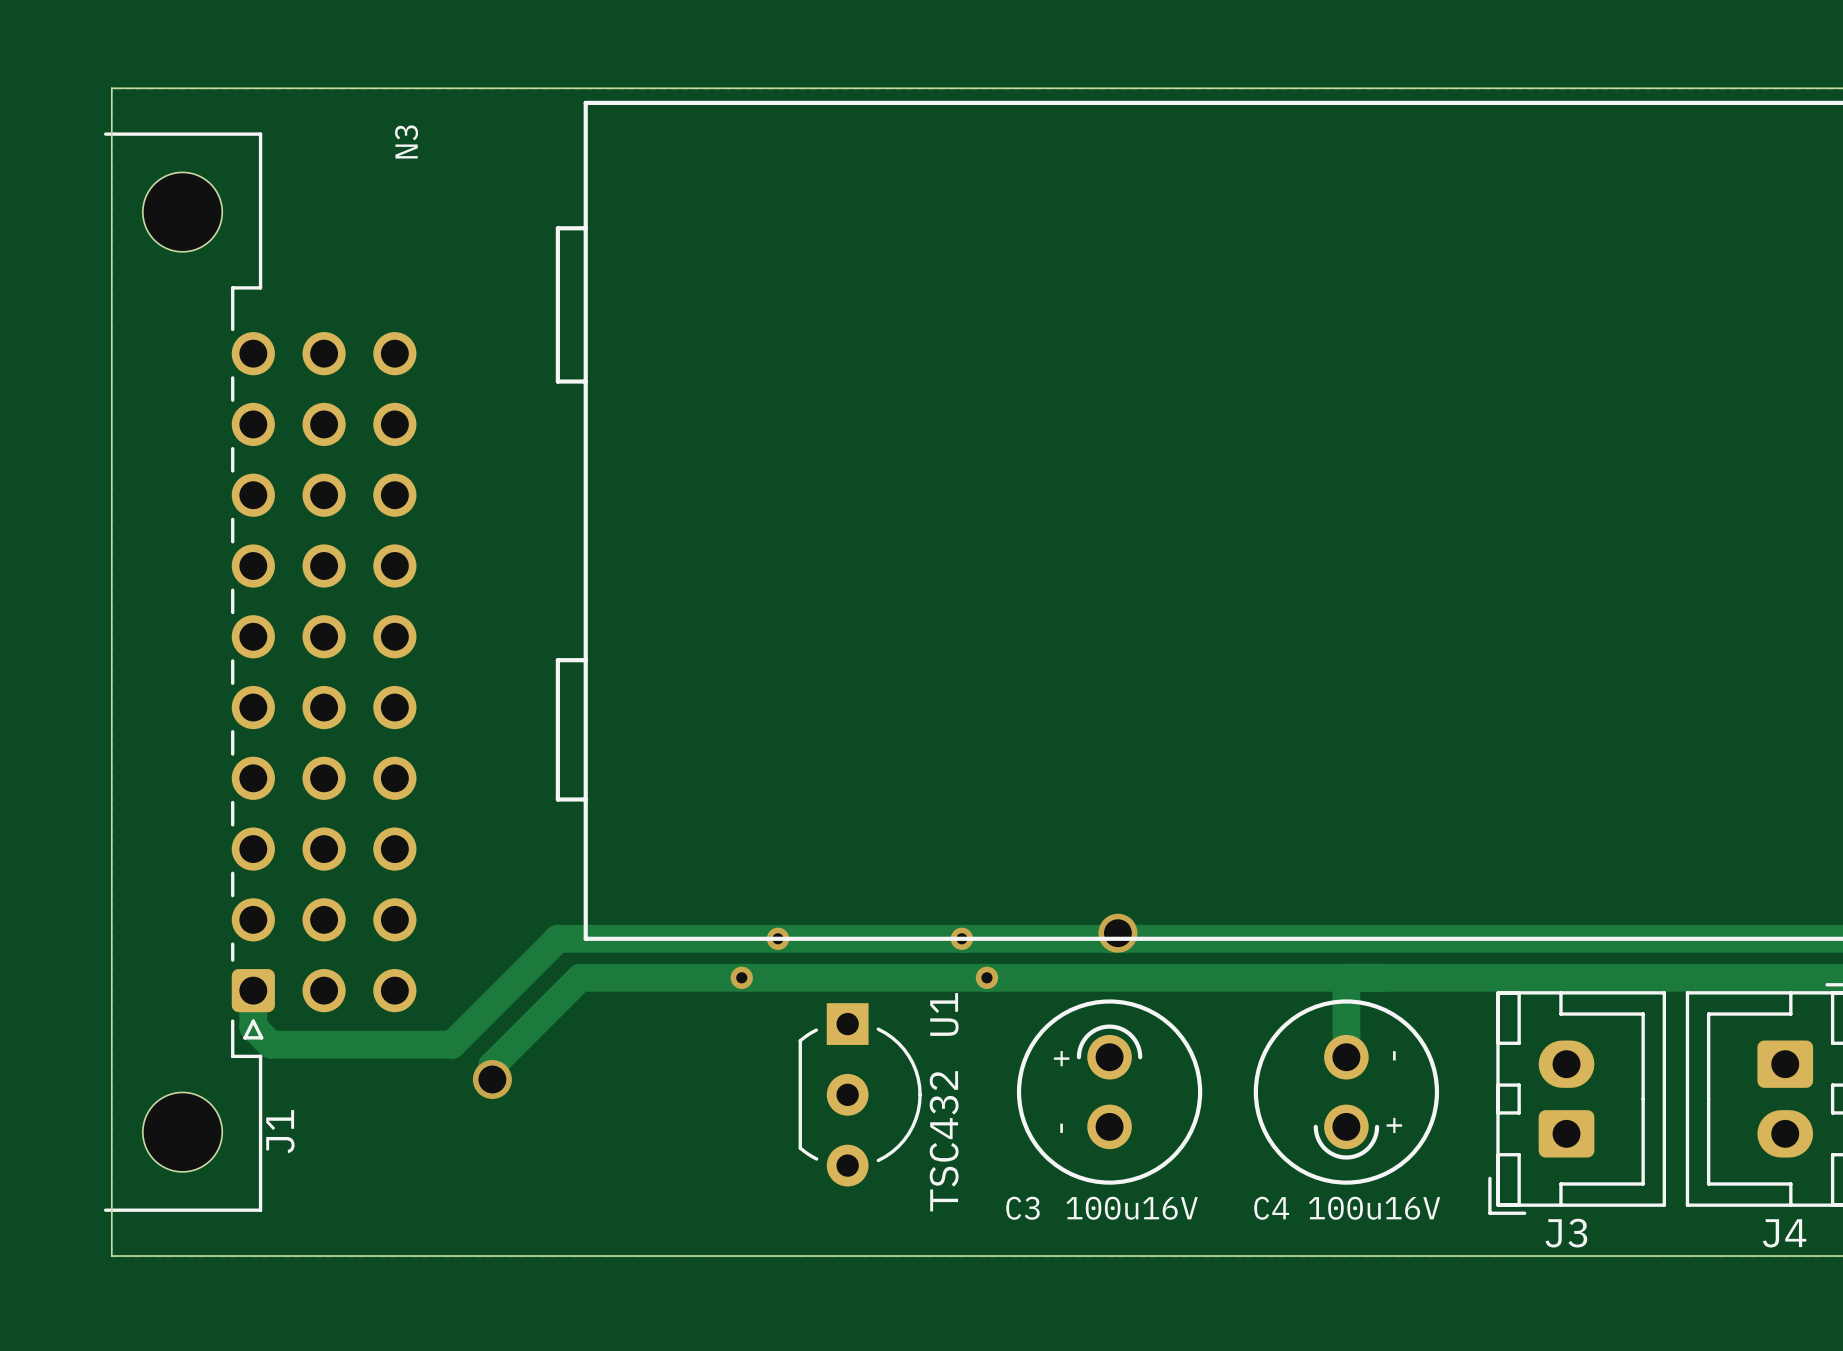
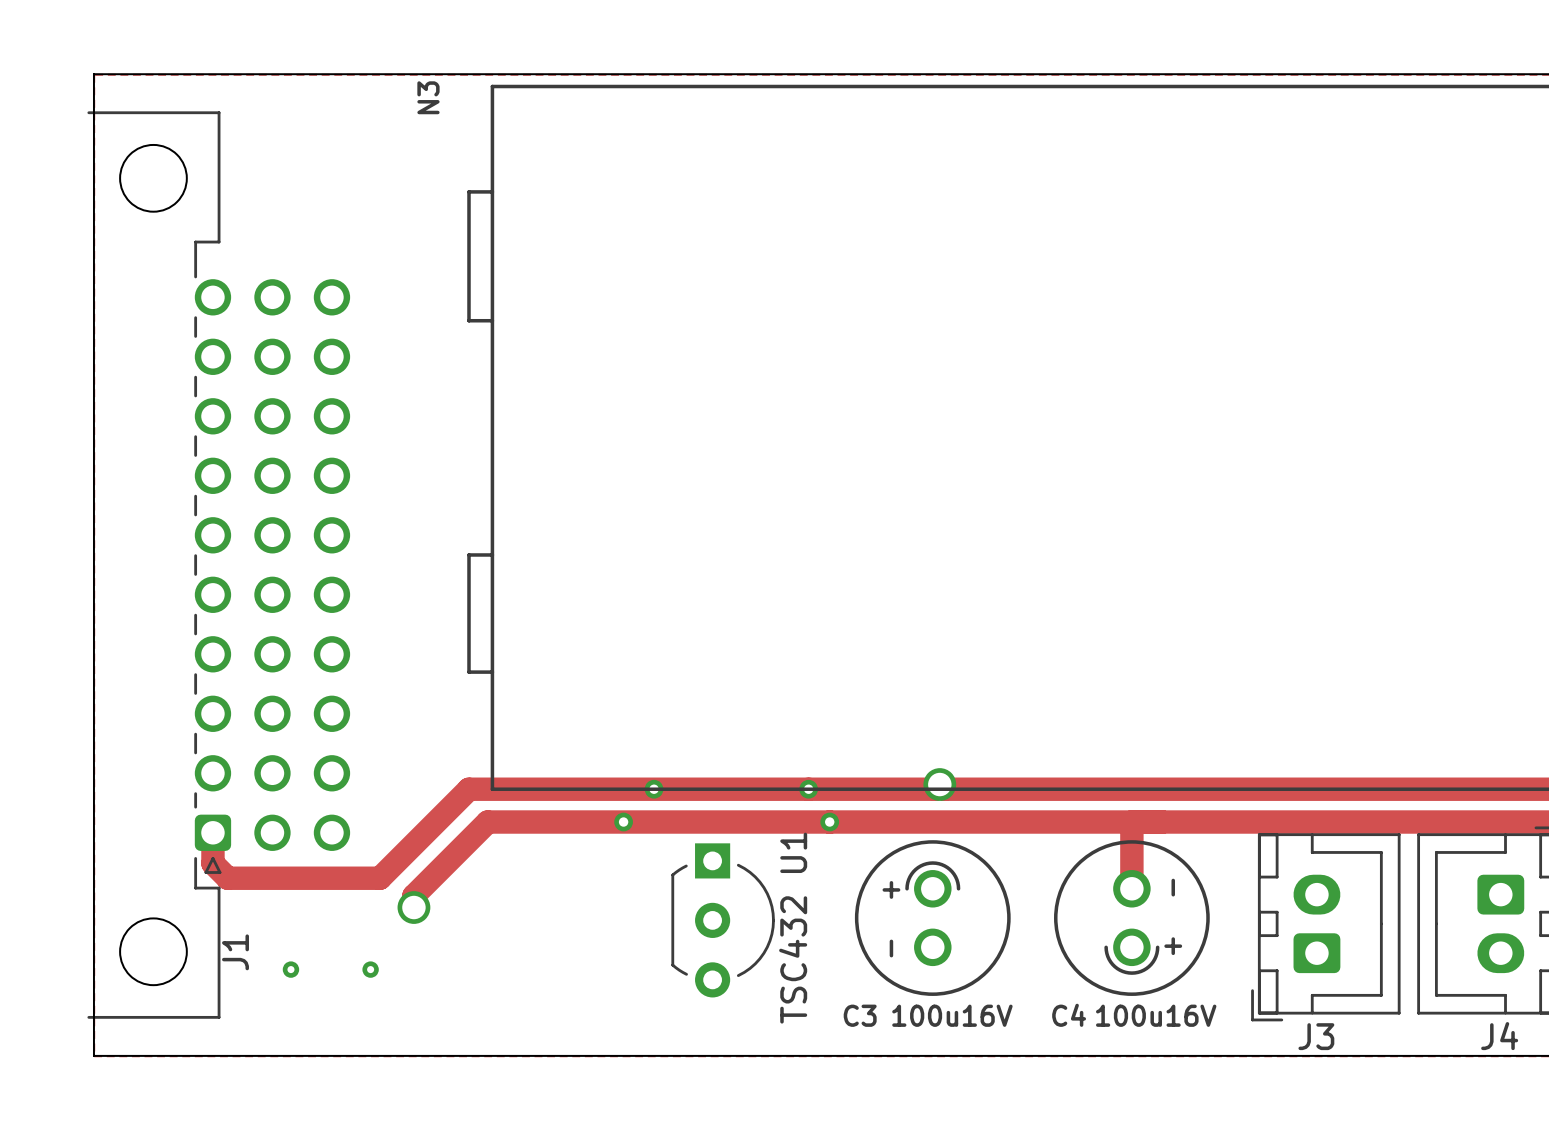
N3 name position: N3 (406, 141) -> N3 (428, 97)
via: none -> (290, 969)
via: none -> (370, 969)

